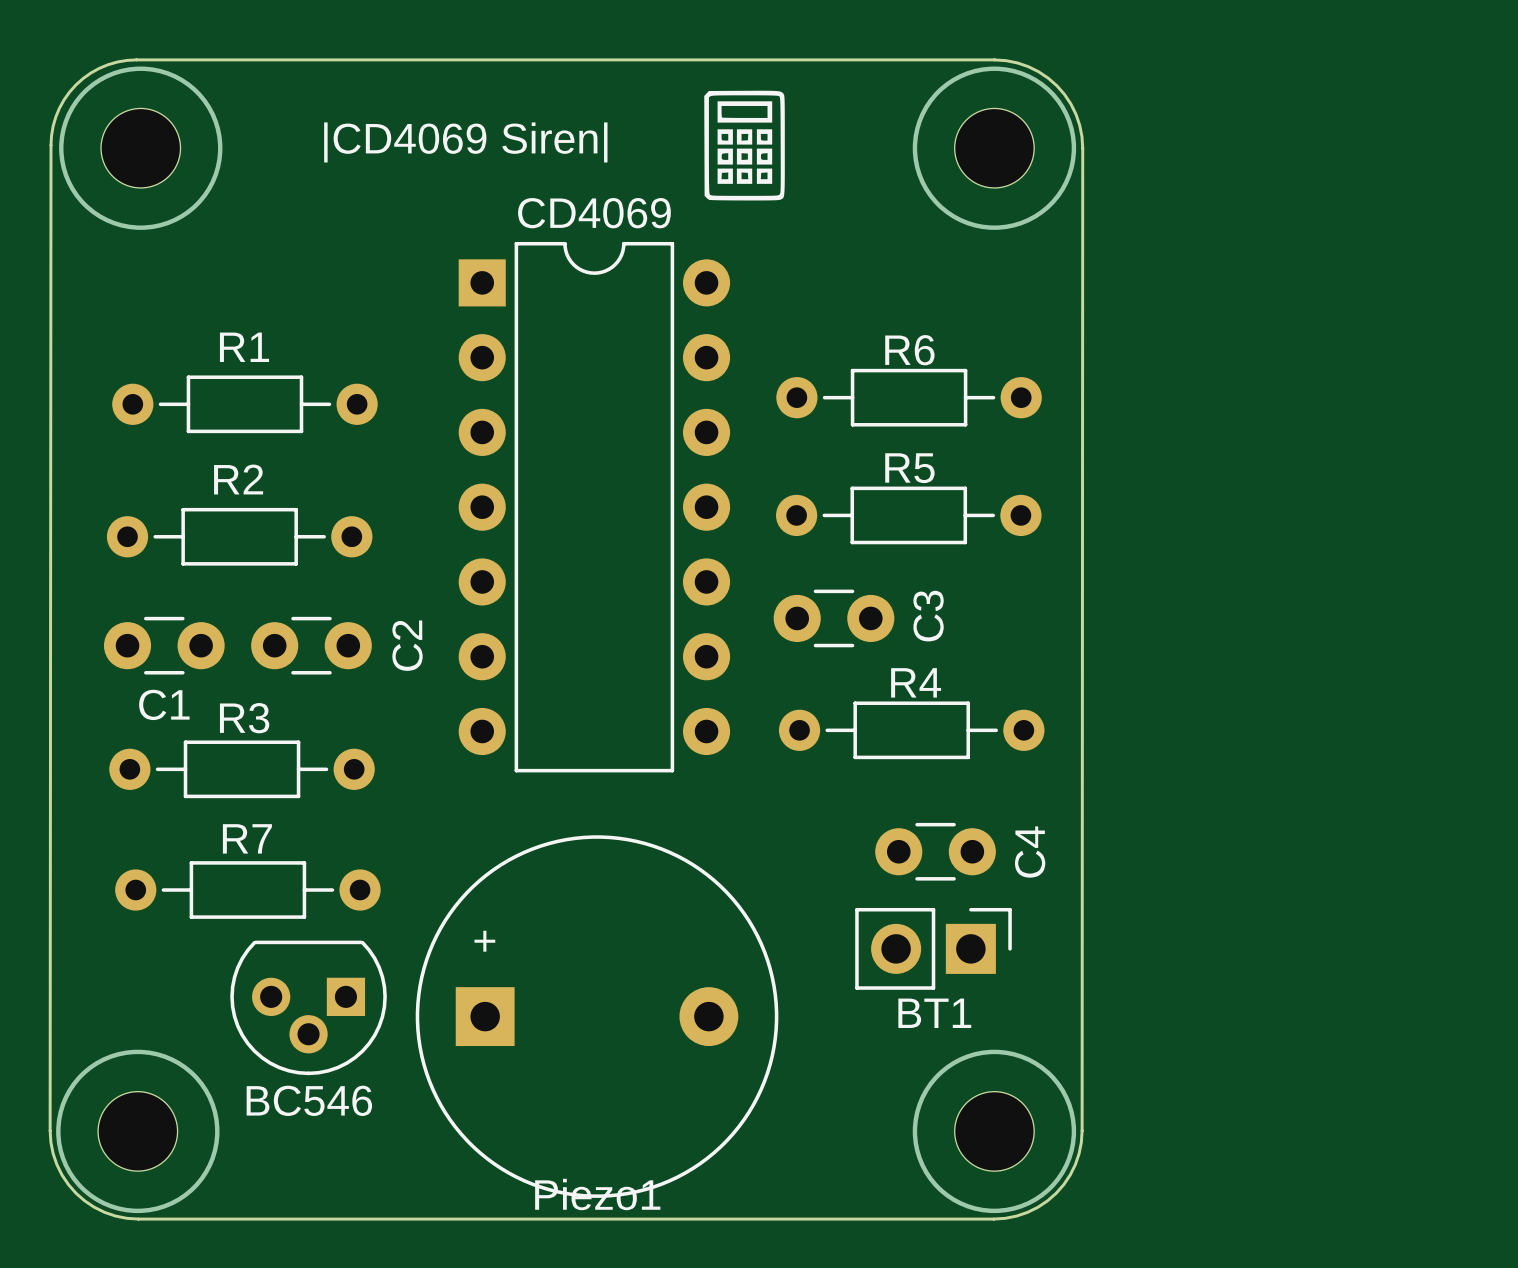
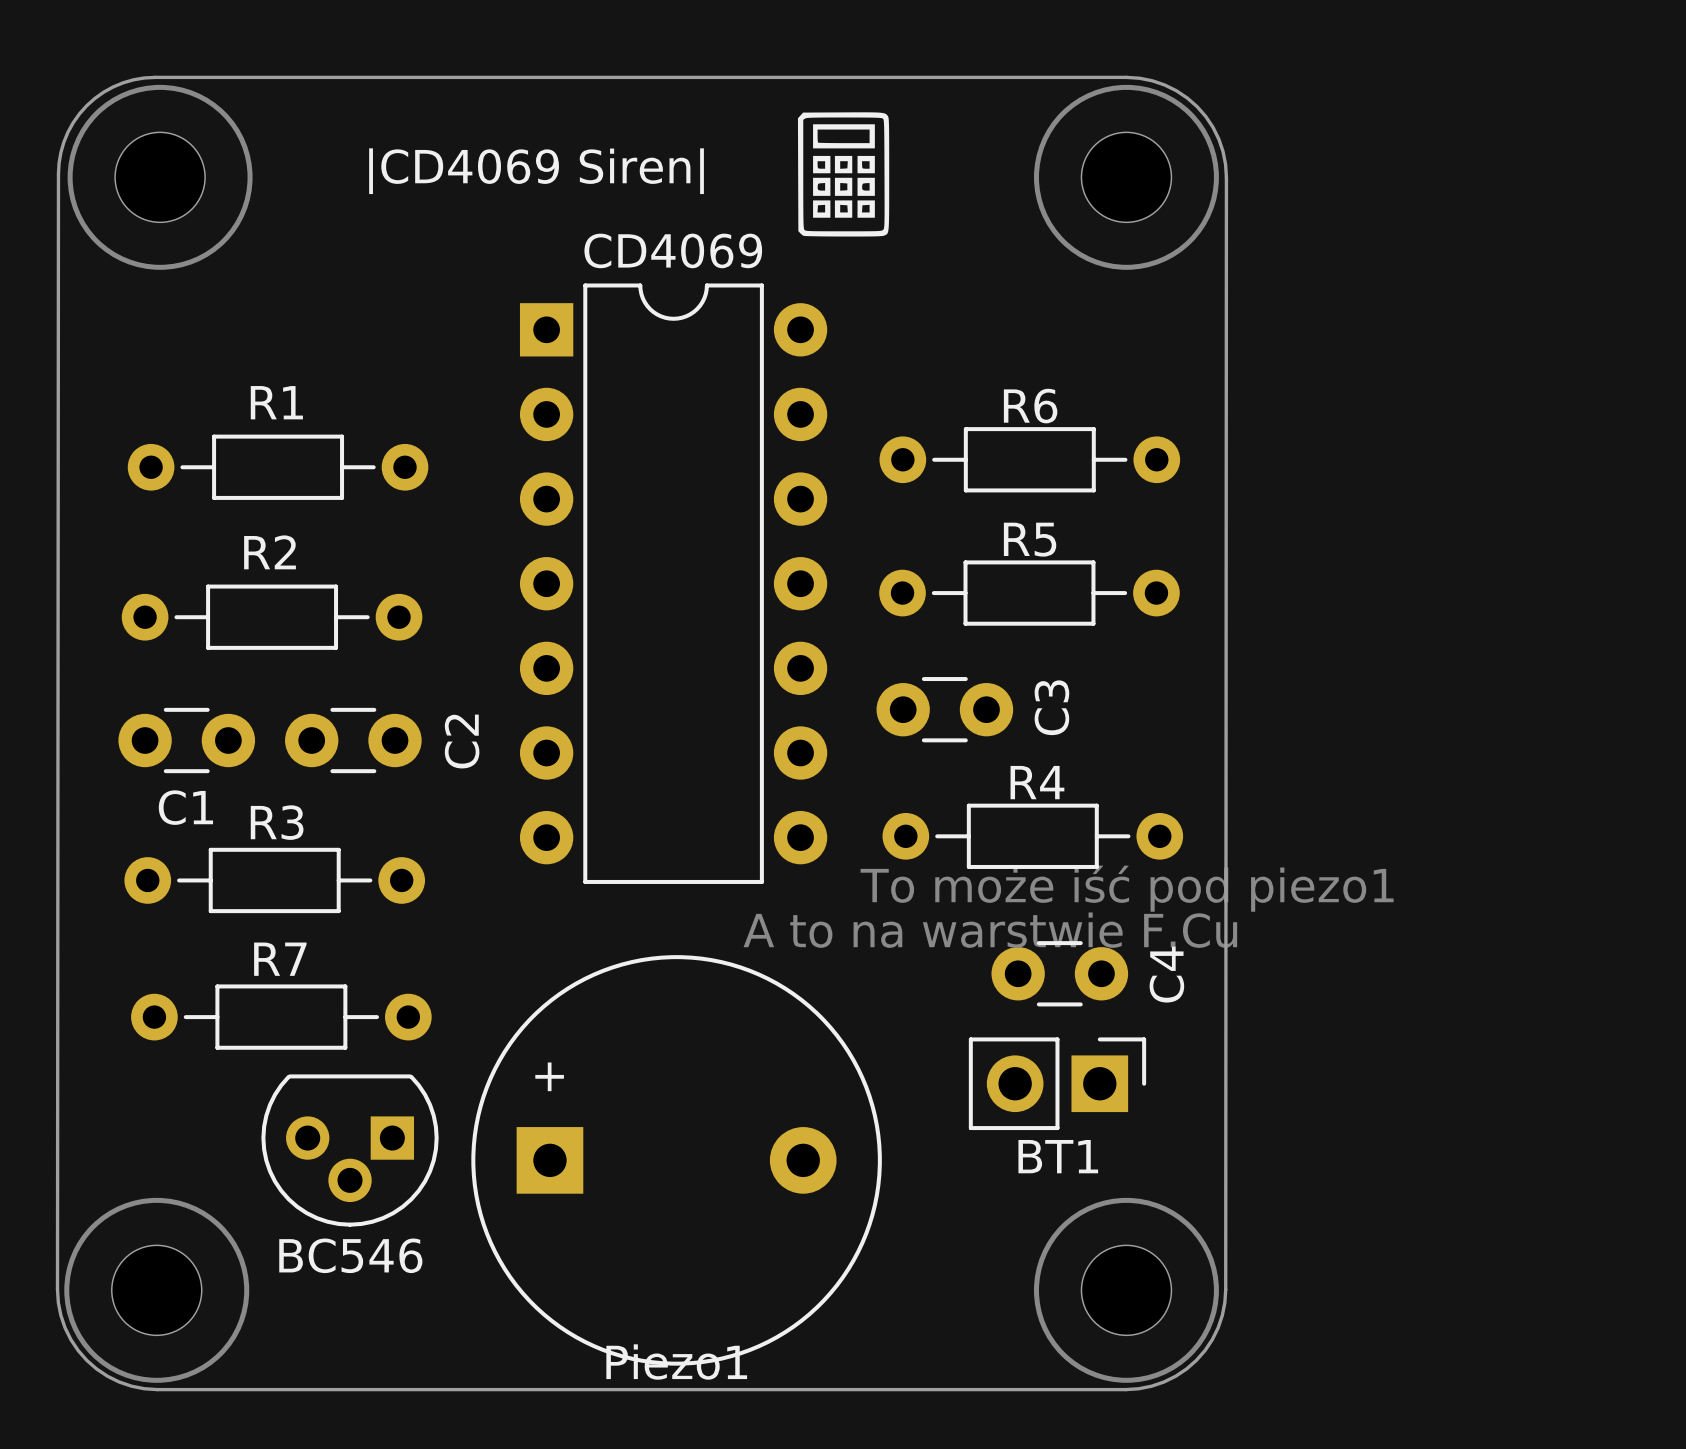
text: none -> To może iść pod piezo1 (1127, 888)
text: none -> A to na warstwie F.Cu (990, 930)

